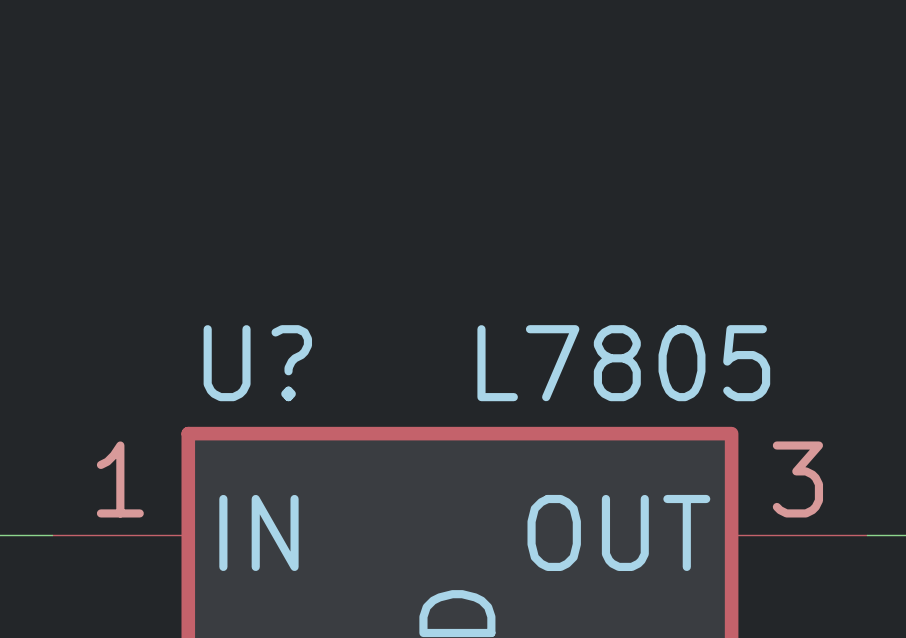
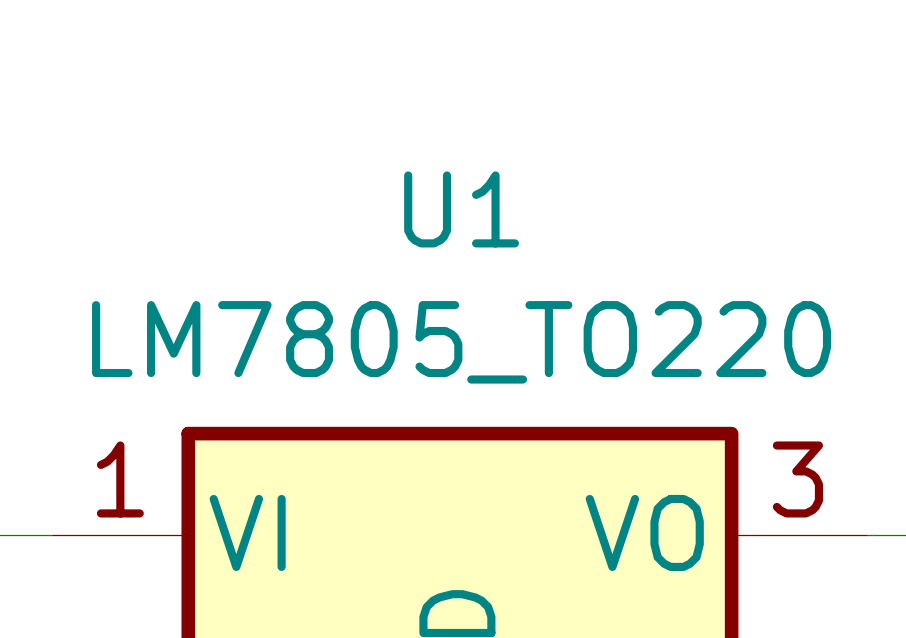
U? name: U? (257, 363) -> U1 (461, 209)
U? value: L7805 (623, 363) -> LM7805_TO220 (461, 342)
U? pin name: IN (258, 532) -> VI (247, 532)
U? pin name: OUT (618, 532) -> VO (644, 532)

